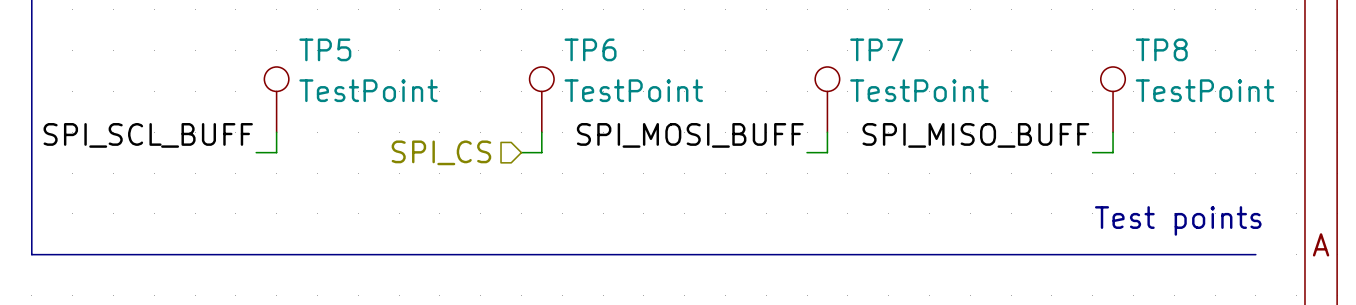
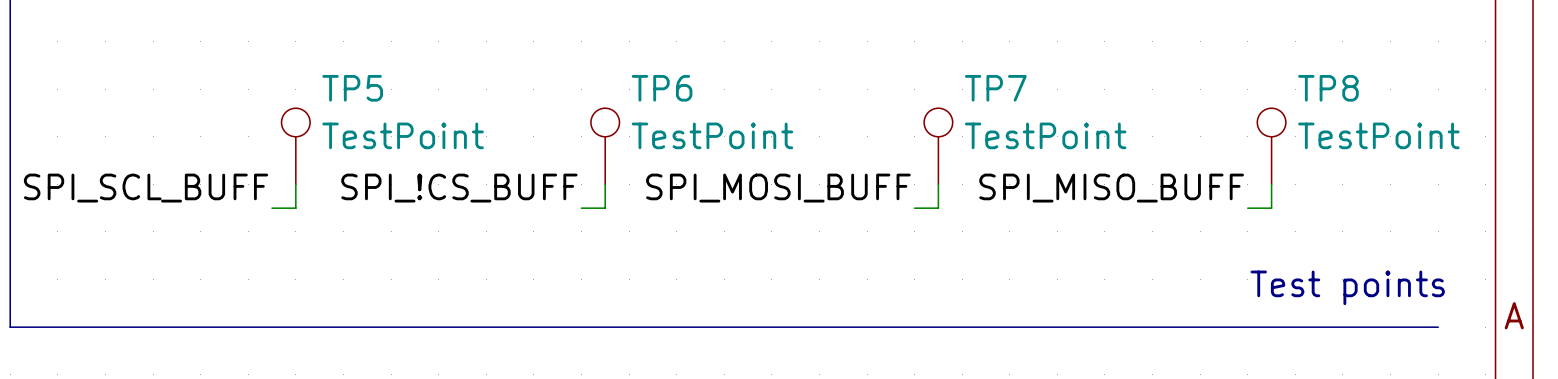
label: none -> SPI_!CS_BUFF (459, 188)
hierarchical label: SPI_CS (441, 152) -> none

